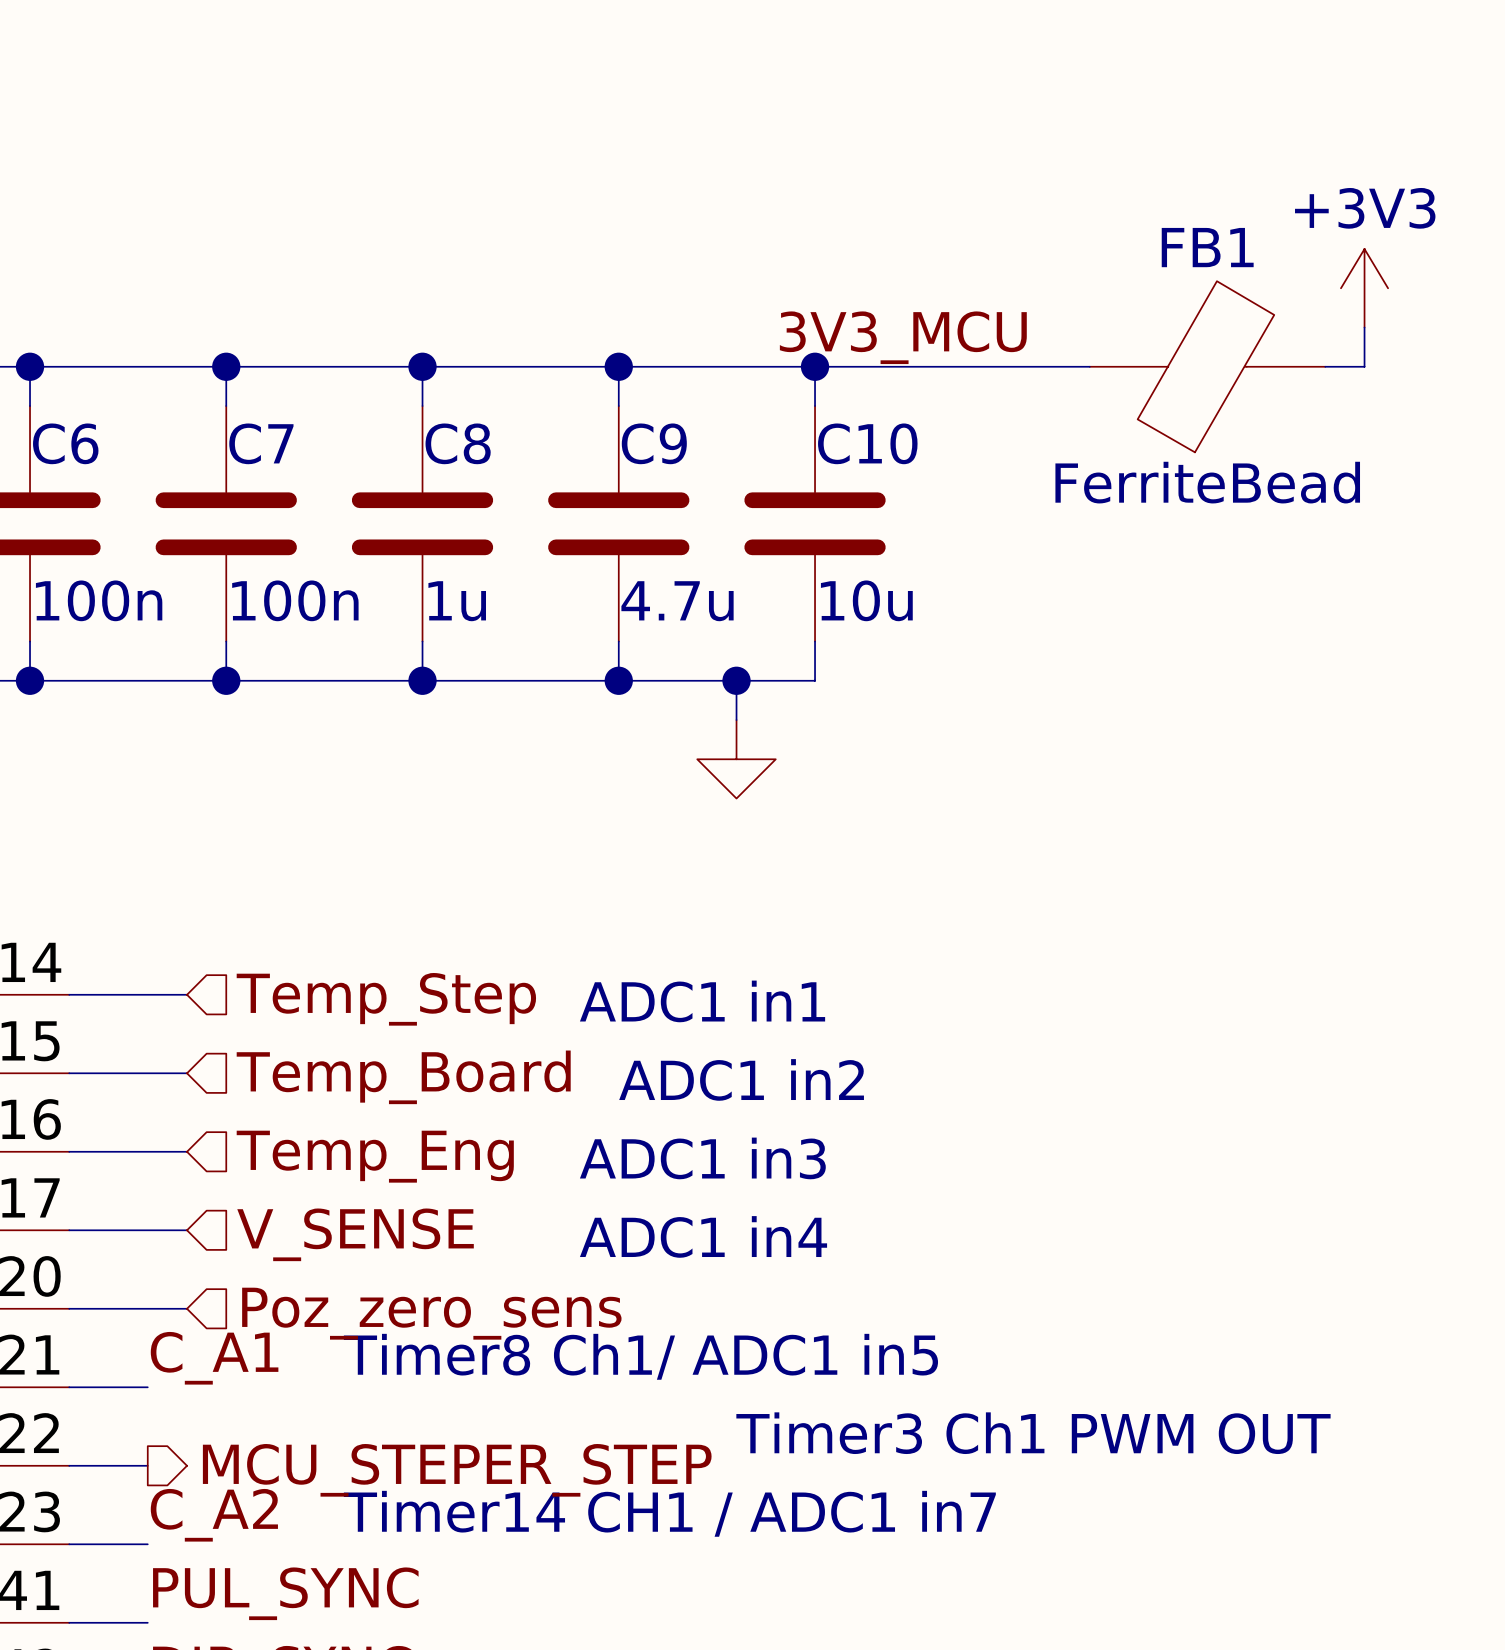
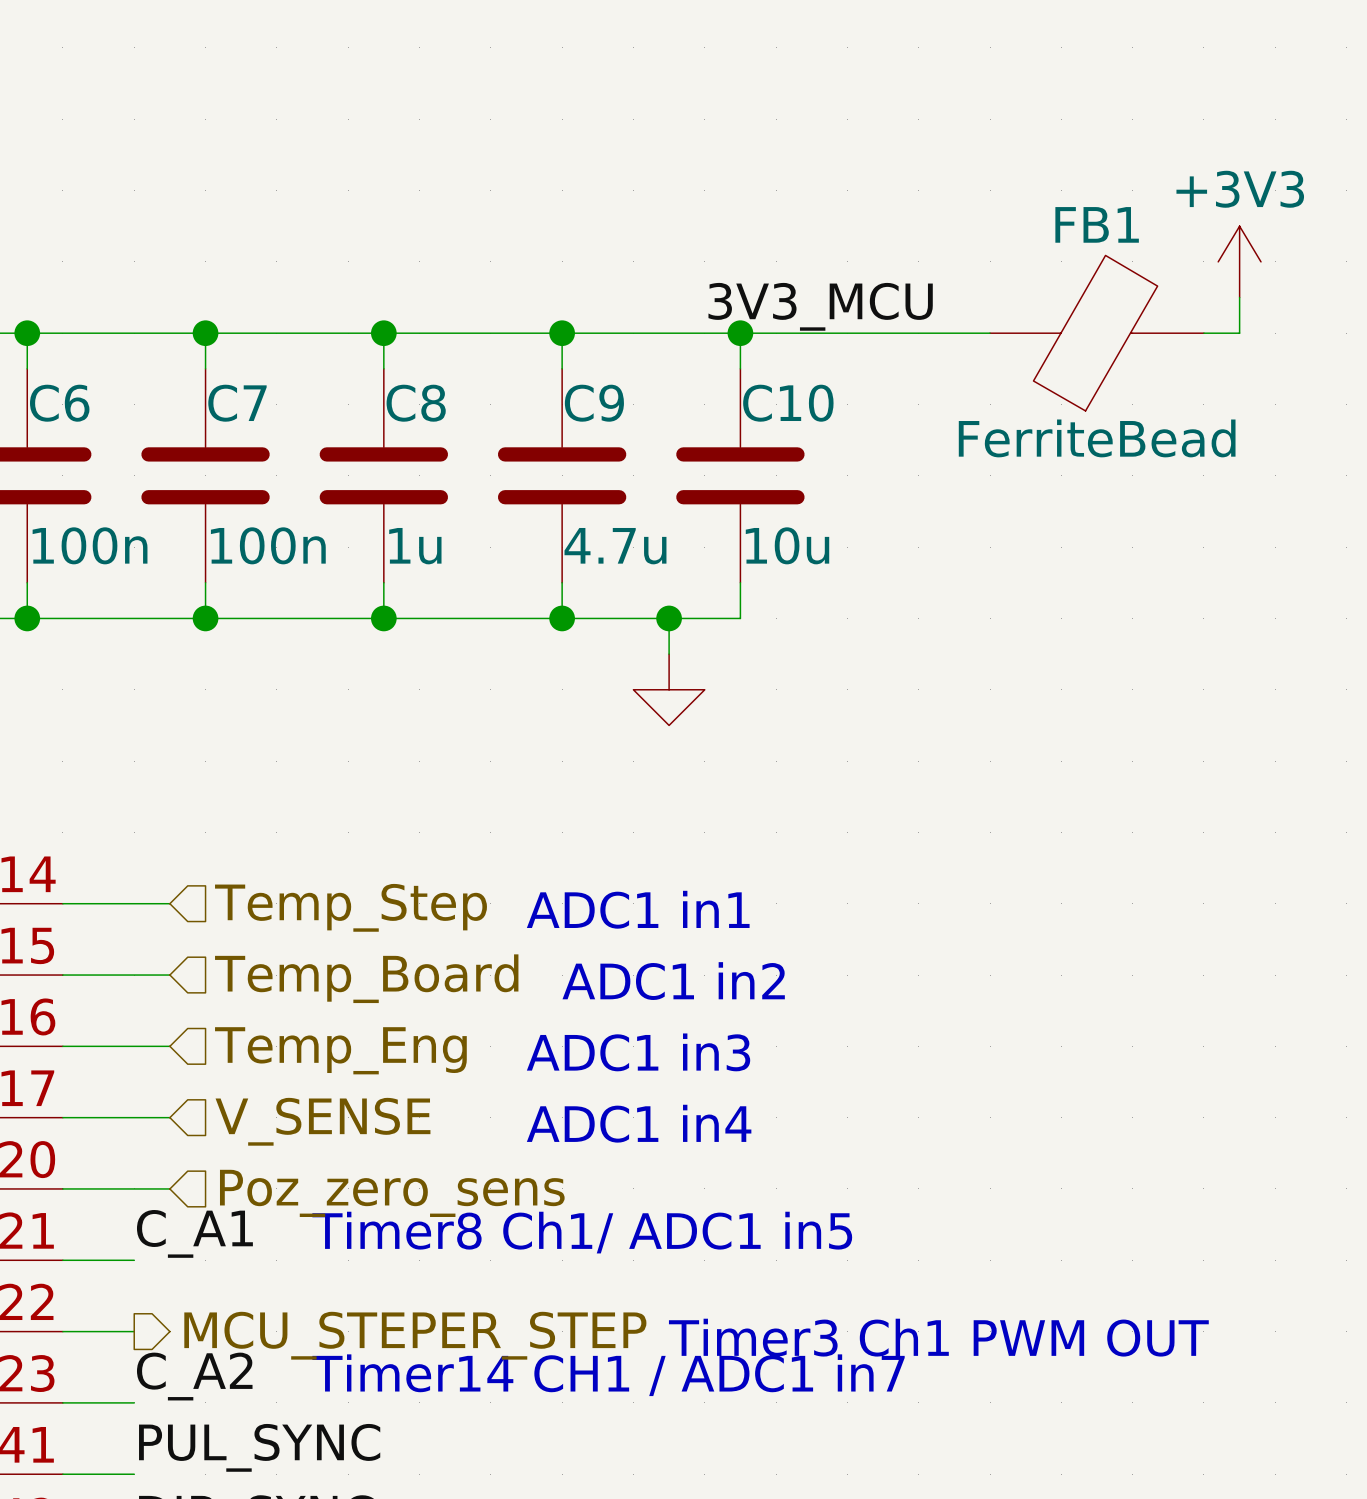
text position: Timer3 Ch1 PWM OUT (1033, 1433) -> Timer3 Ch1 PWM OUT (938, 1337)

